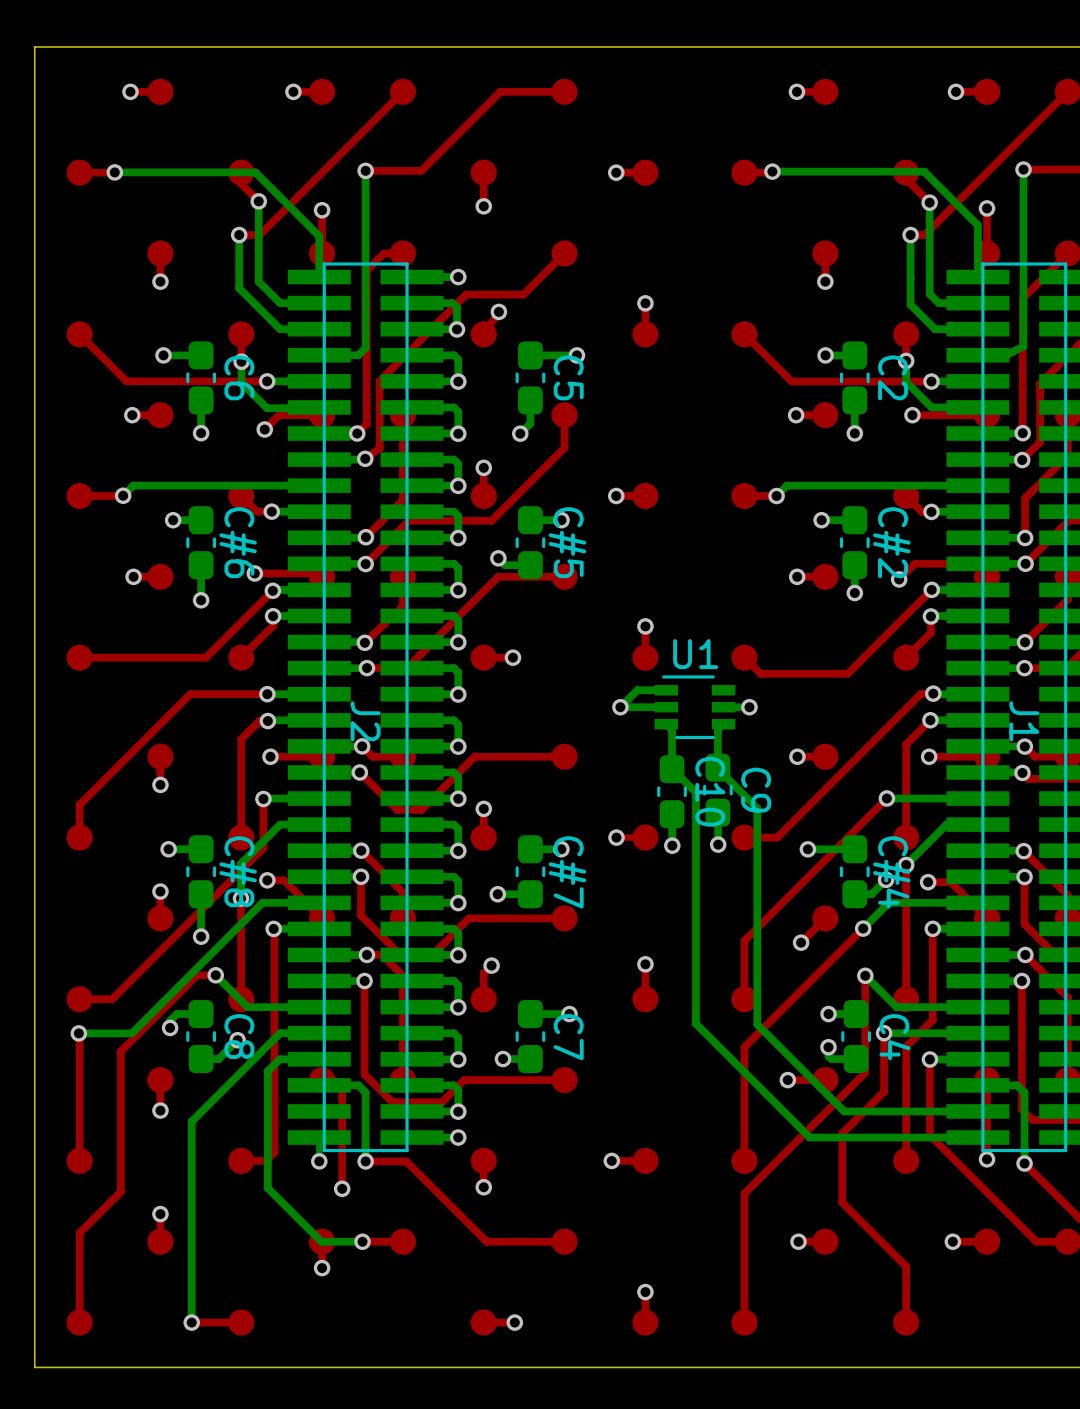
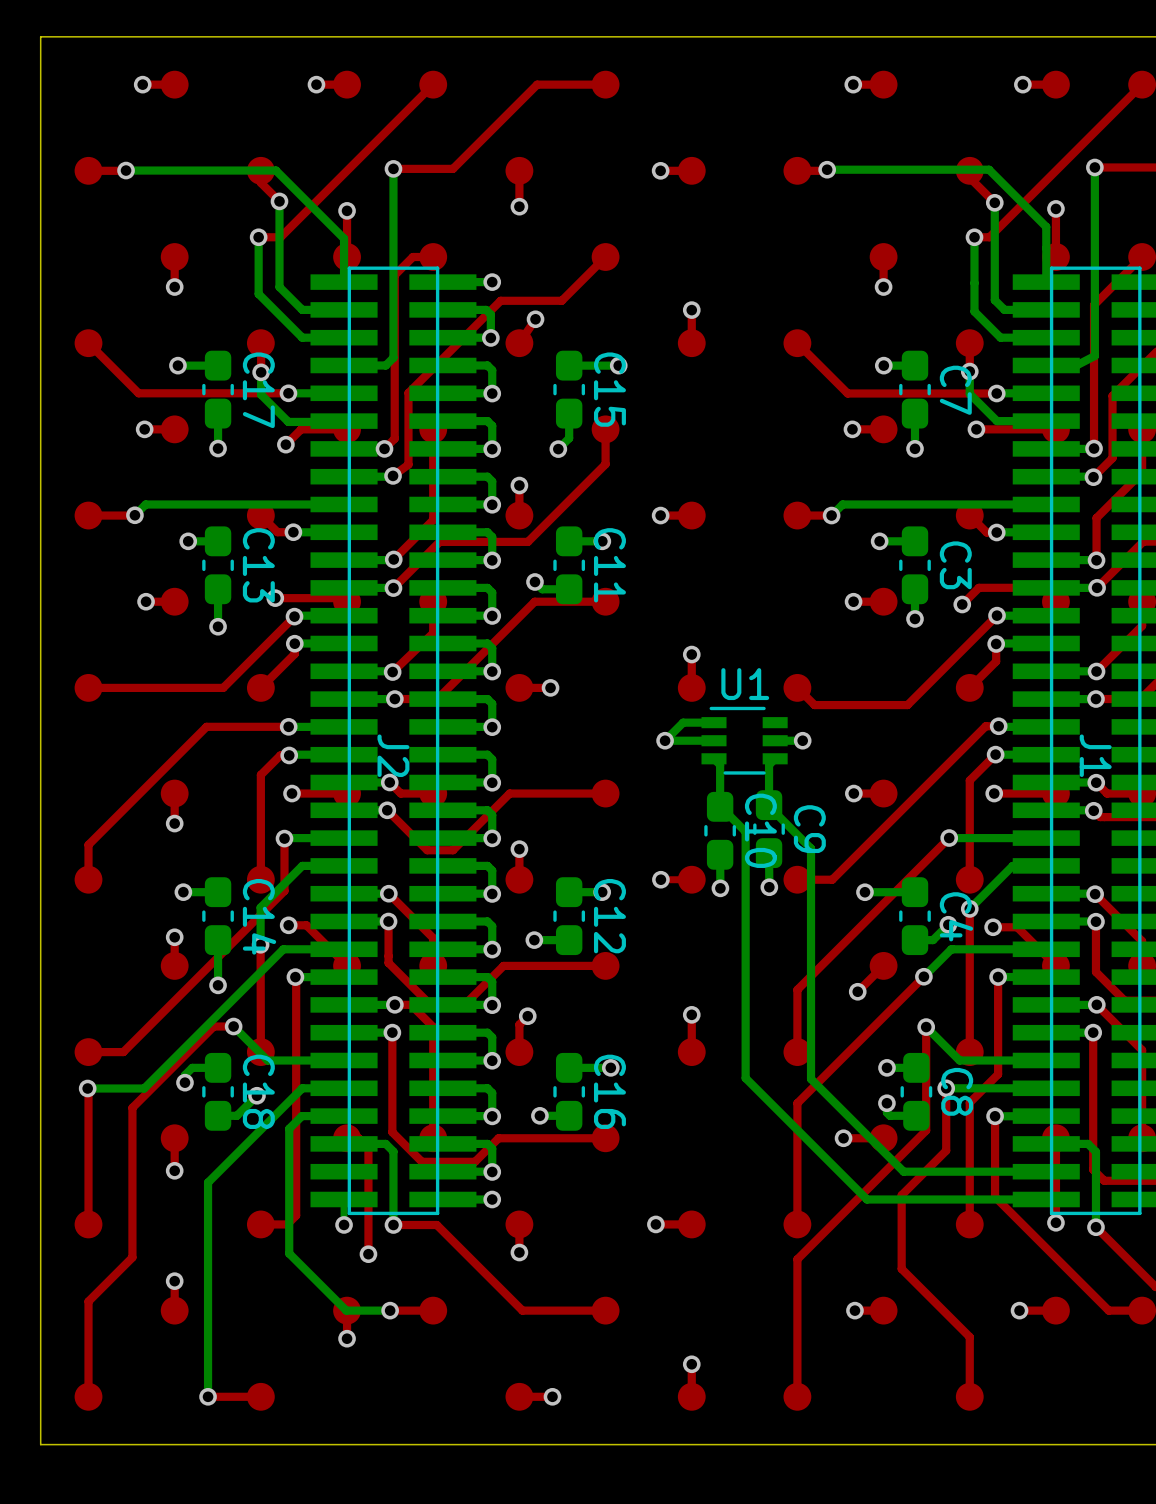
C6 name: C6 (239, 377) -> C17 (258, 390)
C5 name: C5 (568, 377) -> C15 (609, 389)
C2 name: C2 (893, 377) -> C7 (955, 390)
C#6 name: C#6 (238, 542) -> C13 (258, 565)
C#5 name: C#5 (567, 542) -> C11 (609, 565)
C#2 name: C#2 (891, 542) -> C3 (955, 565)
C#8 name: C#8 (238, 871) -> C14 (259, 916)
C#7 name: C#7 (567, 872) -> C12 (609, 916)
C#4 name: C#4 (891, 872) -> C4 (956, 916)
C8 name: C8 (239, 1036) -> C18 (258, 1091)
C7 name: C7 (568, 1037) -> C16 (609, 1091)
C4 name: C4 (895, 1037) -> C8 (957, 1091)

